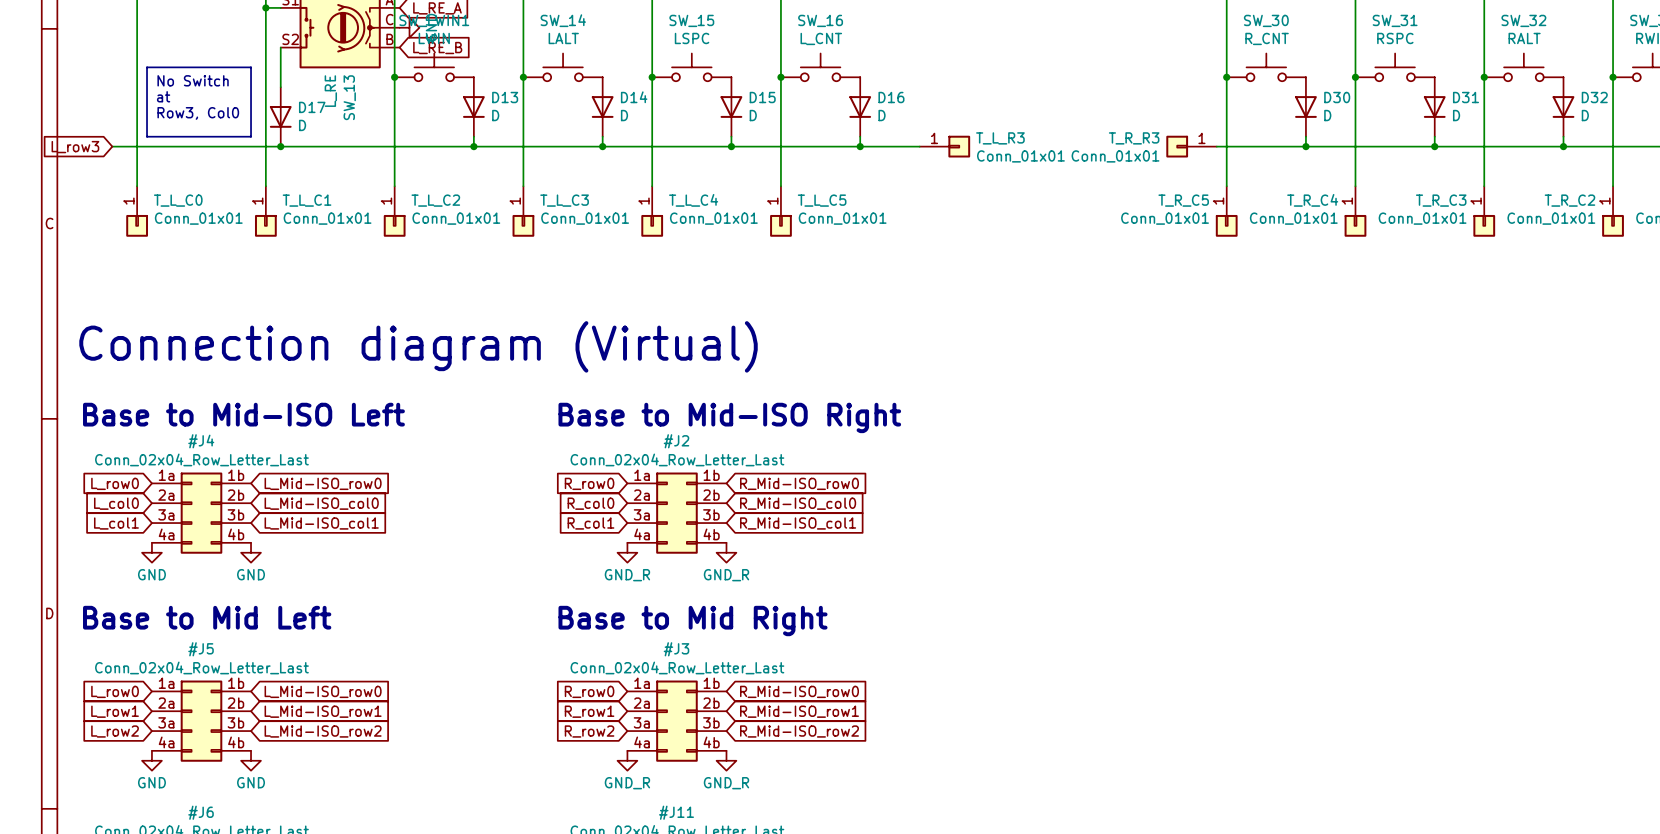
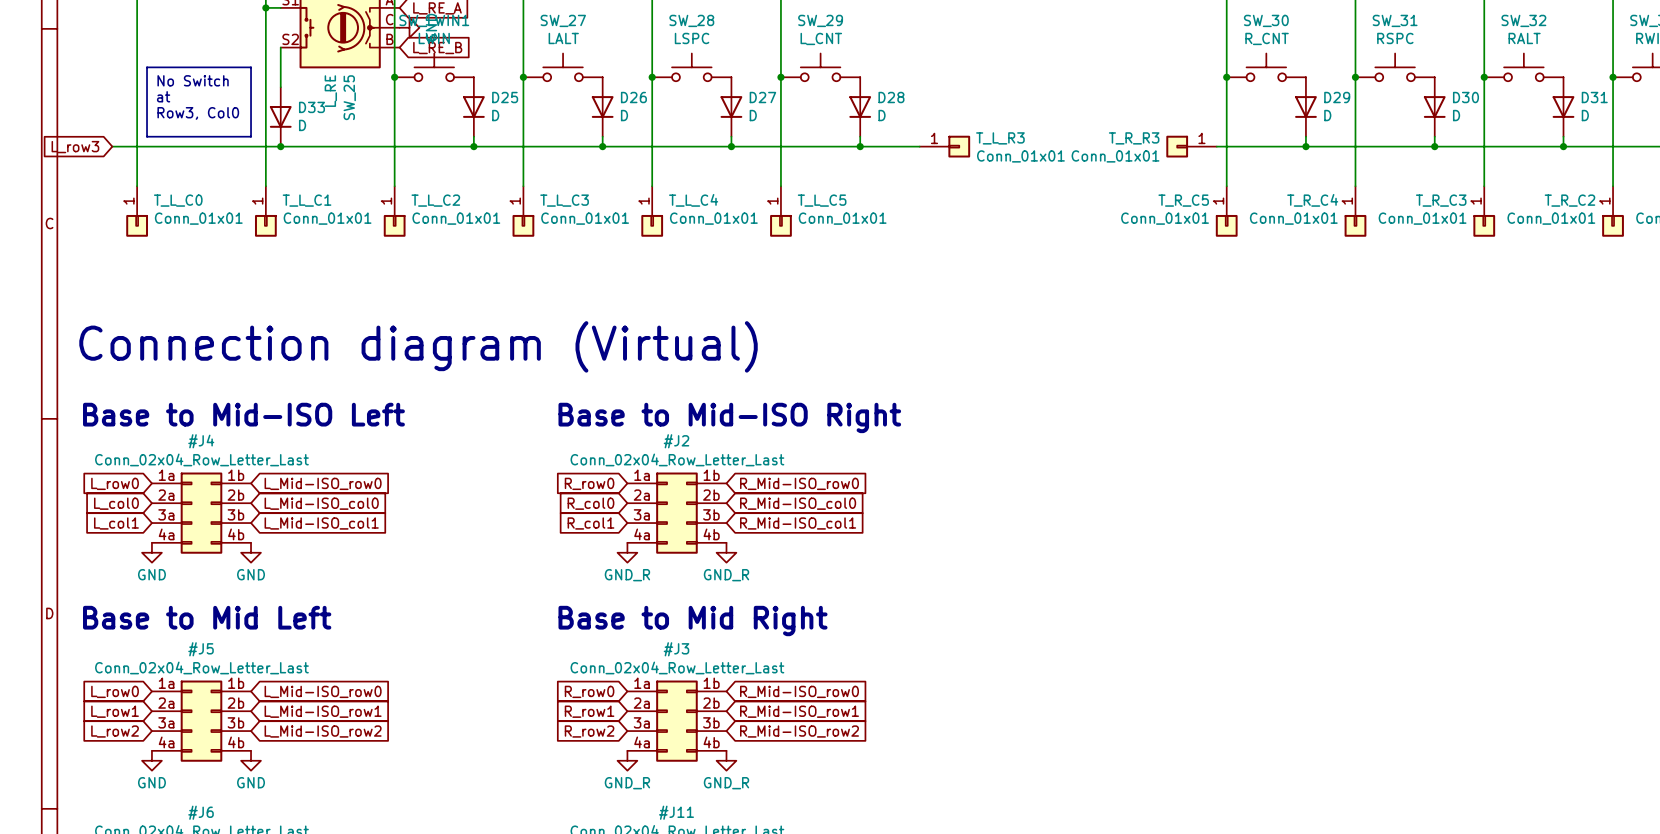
SW_14 name: SW_14 (563, 20) -> SW_27 (563, 20)
SW_15 name: SW_15 (691, 20) -> SW_28 (691, 20)
SW_16 name: SW_16 (820, 20) -> SW_29 (820, 20)
SW_13 name: SW_13 (349, 97) -> SW_25 (349, 97)
D13 name: D13 (505, 97) -> D25 (505, 97)
D14 name: D14 (634, 97) -> D26 (633, 97)
D15 name: D15 (762, 97) -> D27 (762, 97)
D16 name: D16 (891, 97) -> D28 (891, 97)
D30 name: D30 (1337, 97) -> D29 (1337, 97)
D31 name: D31 (1465, 97) -> D30 (1465, 97)
D32 name: D32 (1594, 97) -> D31 (1594, 97)
D17 name: D17 (312, 107) -> D33 (311, 107)

